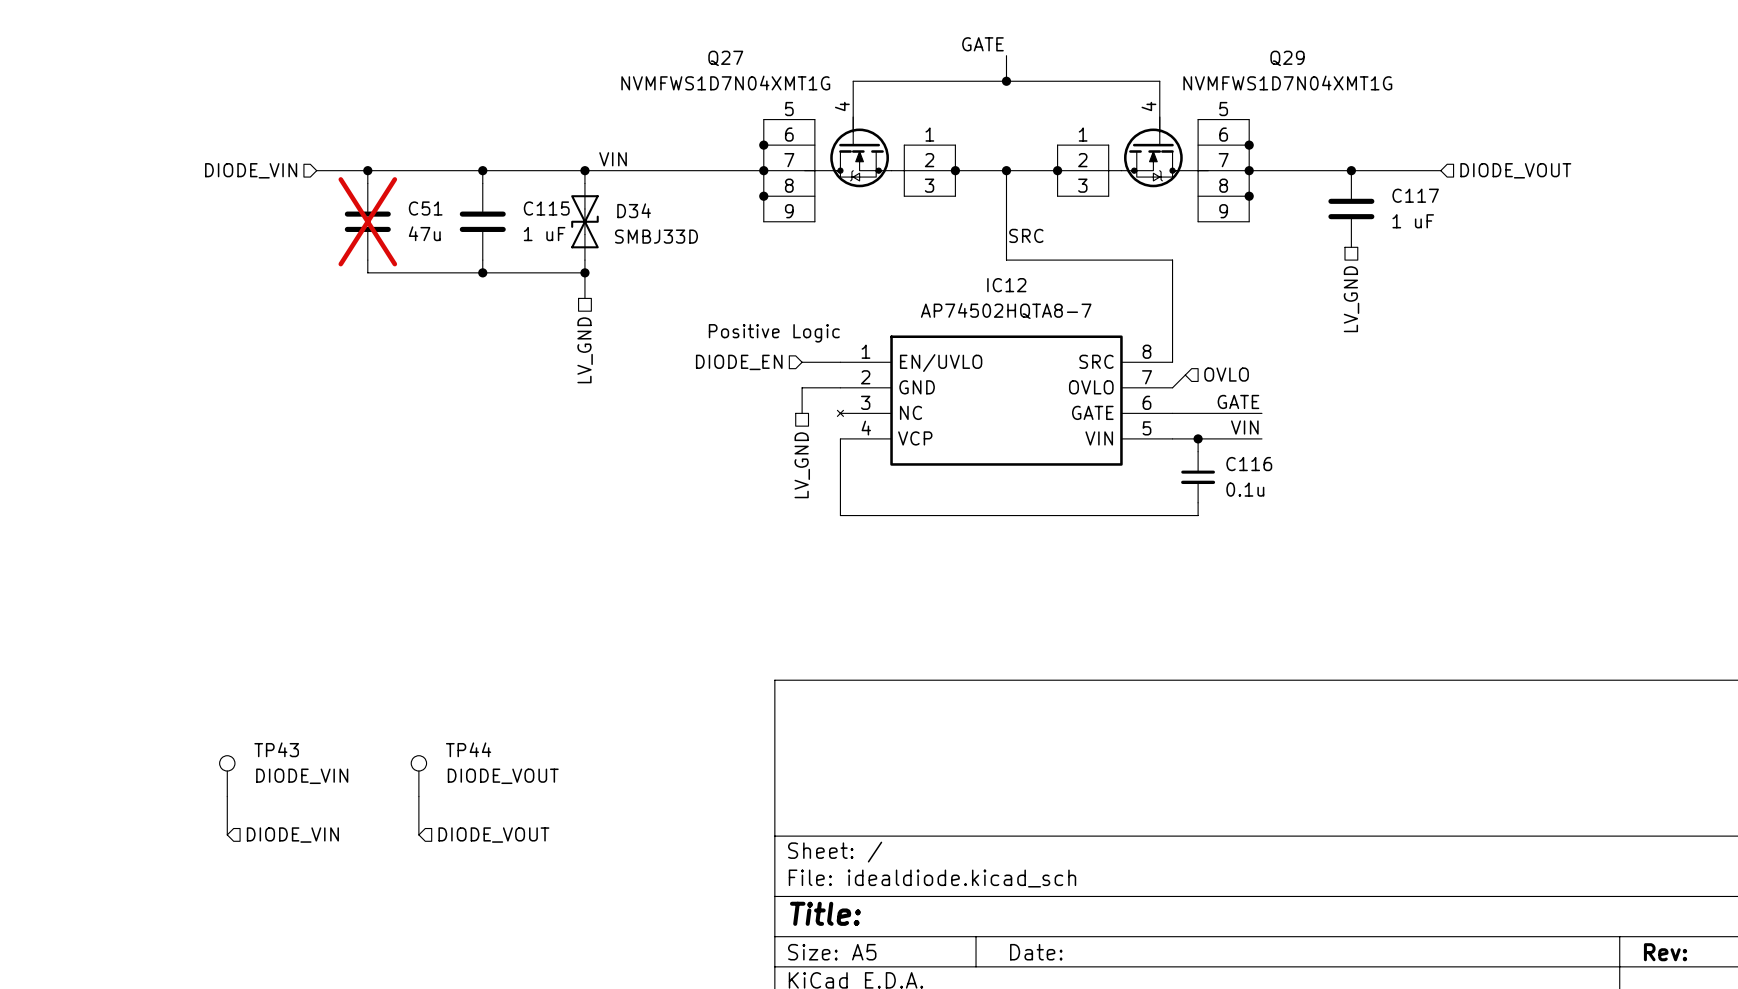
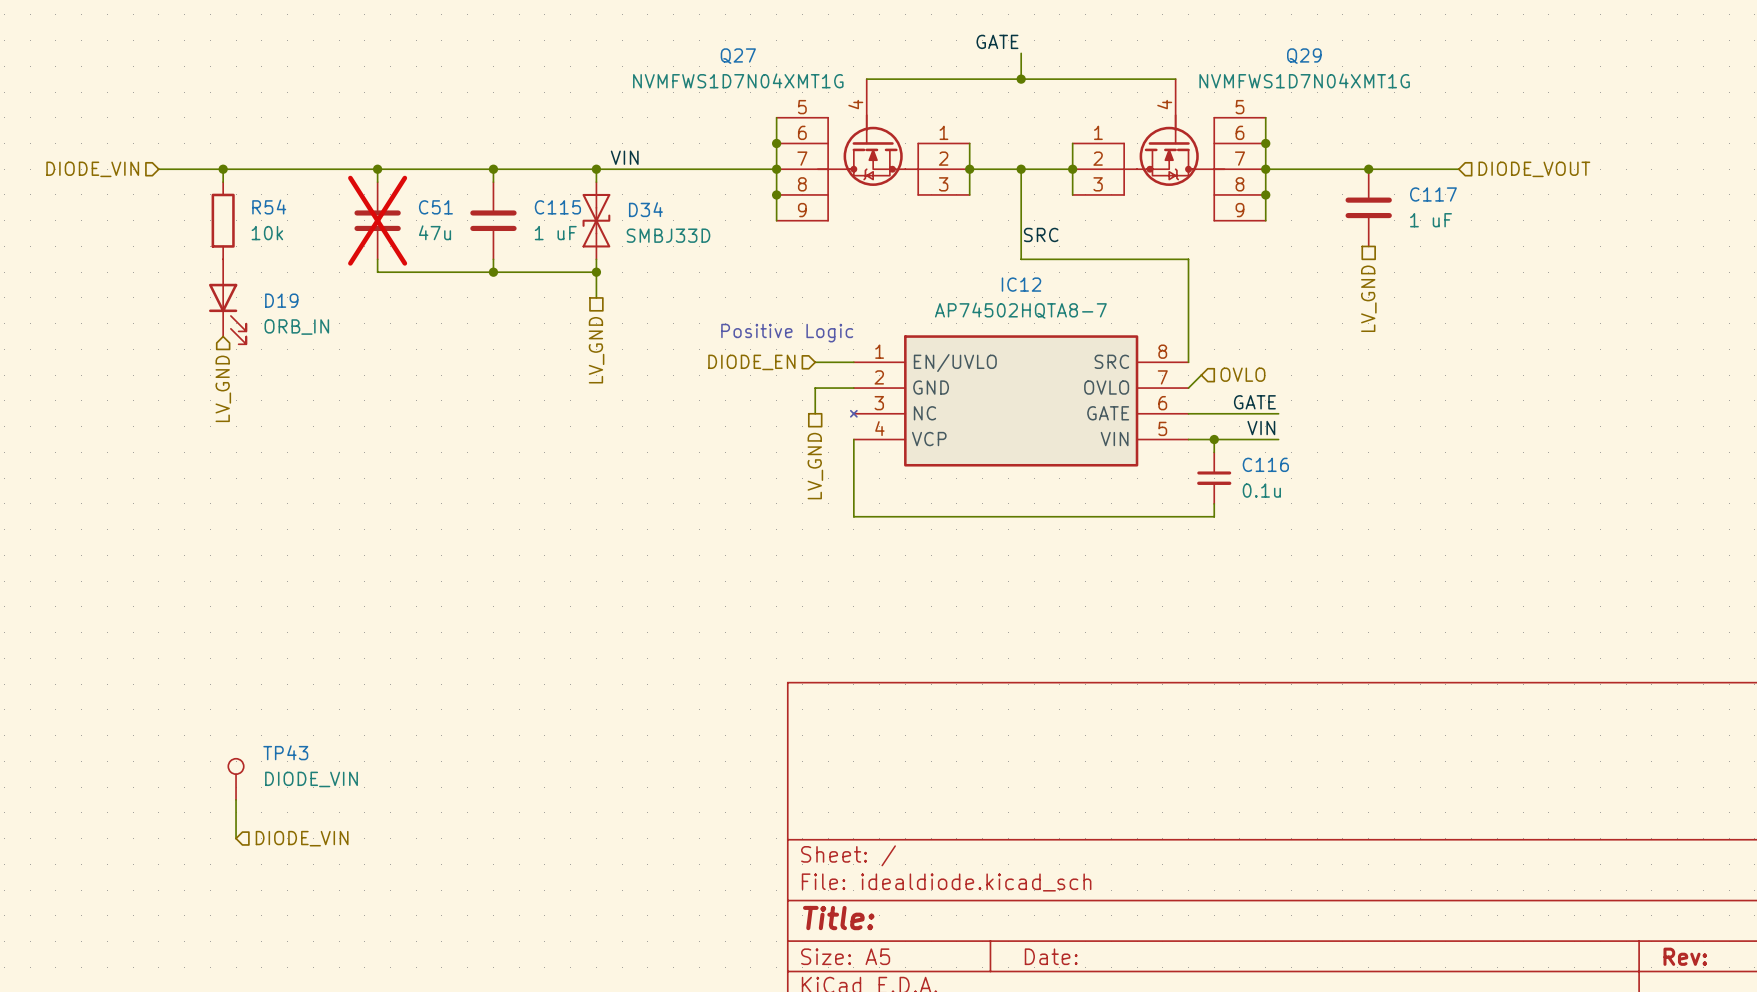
wire: none -> (158, 169) (326, 169)
wire: none -> (223, 169) (223, 182)
junction: none -> (223, 169)
hierarchical label position: DIODE_VIN (251, 170) -> DIODE_VIN (92, 169)
R54: none -> 10k (223, 220)
D19: none -> ORB_IN (227, 301)
hierarchical label: none -> LV_GND (223, 388)
TP44: DIODE_VOUT (418, 776) -> none
wire: (418, 796) (418, 834) -> none
hierarchical label: DIODE_VOUT (493, 835) -> none

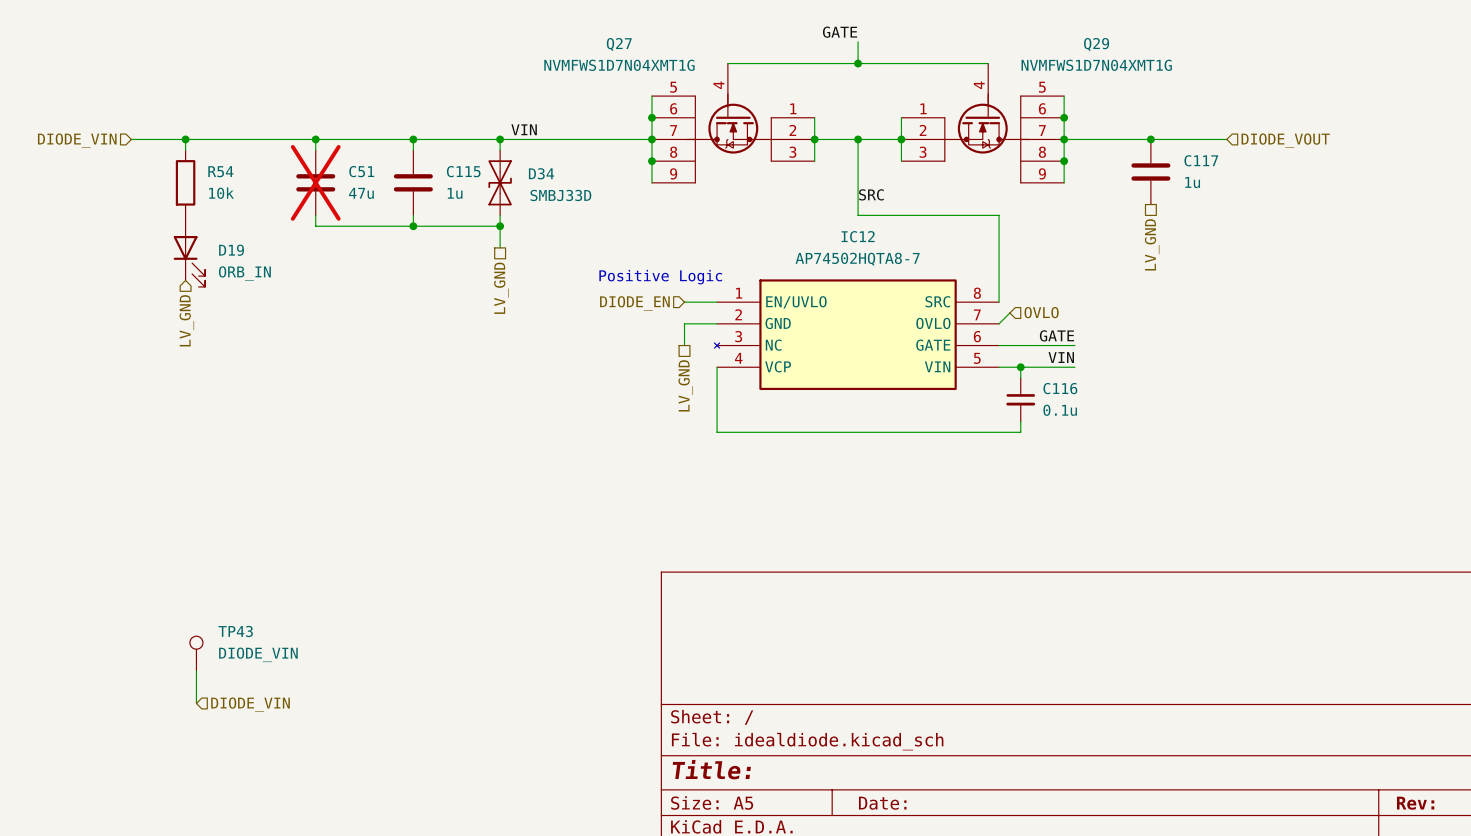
C117 value: 1 uF (1431, 220) -> 1u (1192, 182)
C115 value: 1 uF (555, 233) -> 1u (455, 193)

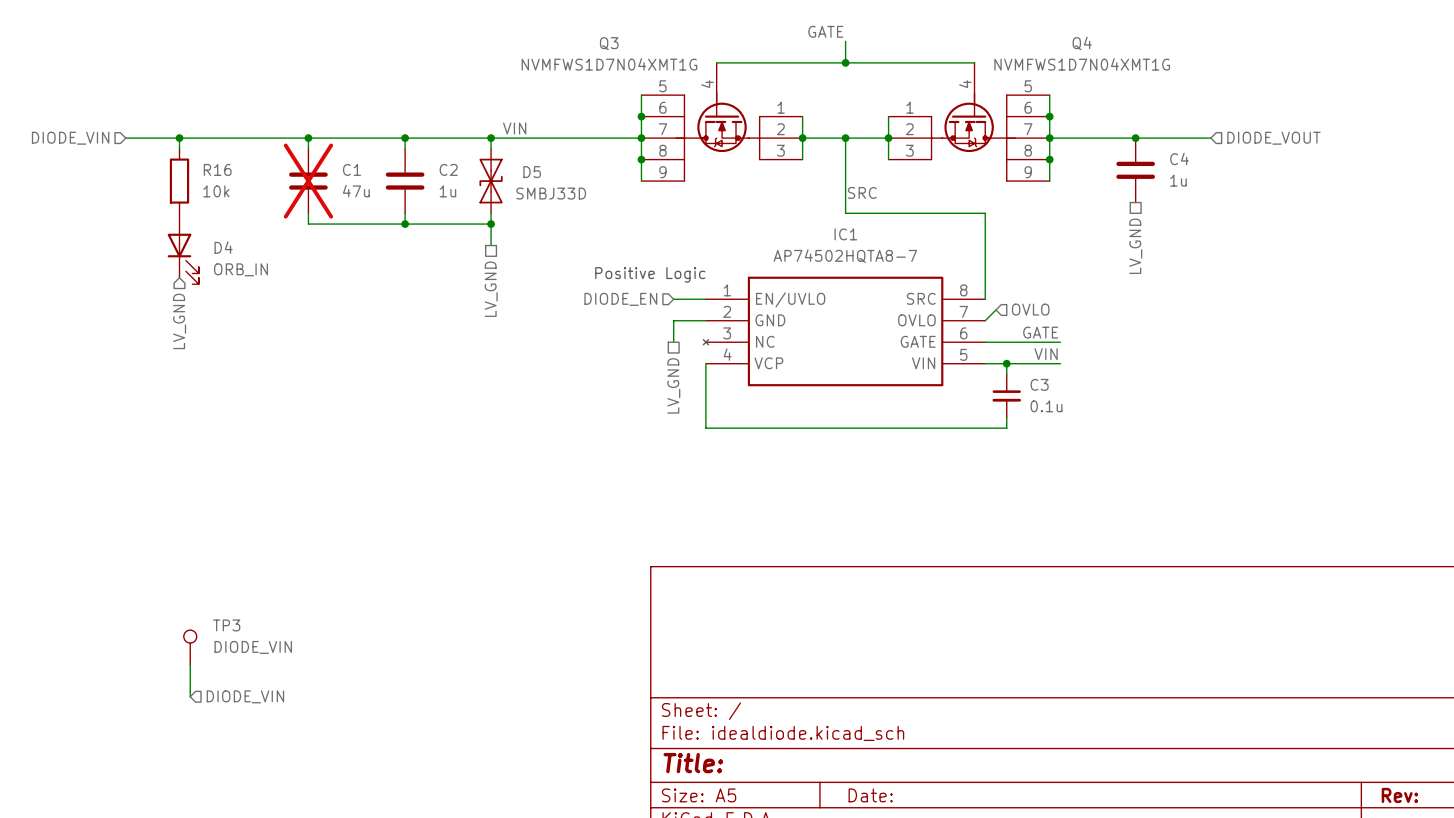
Q27 name: Q27 (619, 44) -> Q3 (609, 43)
Q29 name: Q29 (1096, 44) -> Q4 (1082, 43)
C117 name: C117 (1201, 160) -> C4 (1179, 158)
R54 name: R54 (220, 171) -> R16 (217, 169)
C51 name: C51 (361, 171) -> C1 (351, 169)
C115 name: C115 (463, 171) -> C2 (448, 169)
D34 name: D34 (541, 173) -> D5 (532, 172)
IC12 name: IC12 (858, 236) -> IC1 (845, 234)
D19 name: D19 (231, 250) -> D4 (223, 247)
C116 name: C116 (1060, 388) -> C3 (1039, 384)
TP43 name: TP43 (235, 631) -> TP3 (226, 625)

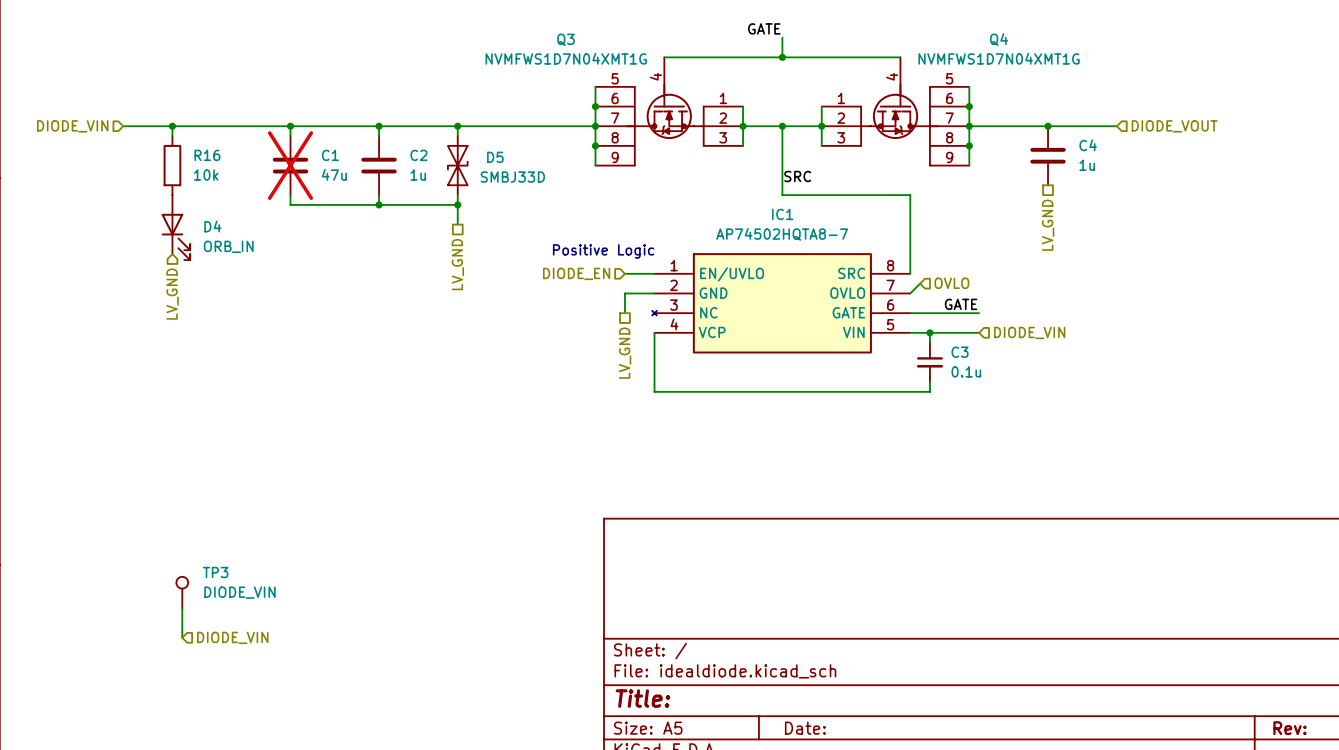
label: VIN (514, 128) -> none
label: VIN (1046, 354) -> none
hierarchical label: none -> DIODE_VIN (1029, 332)

